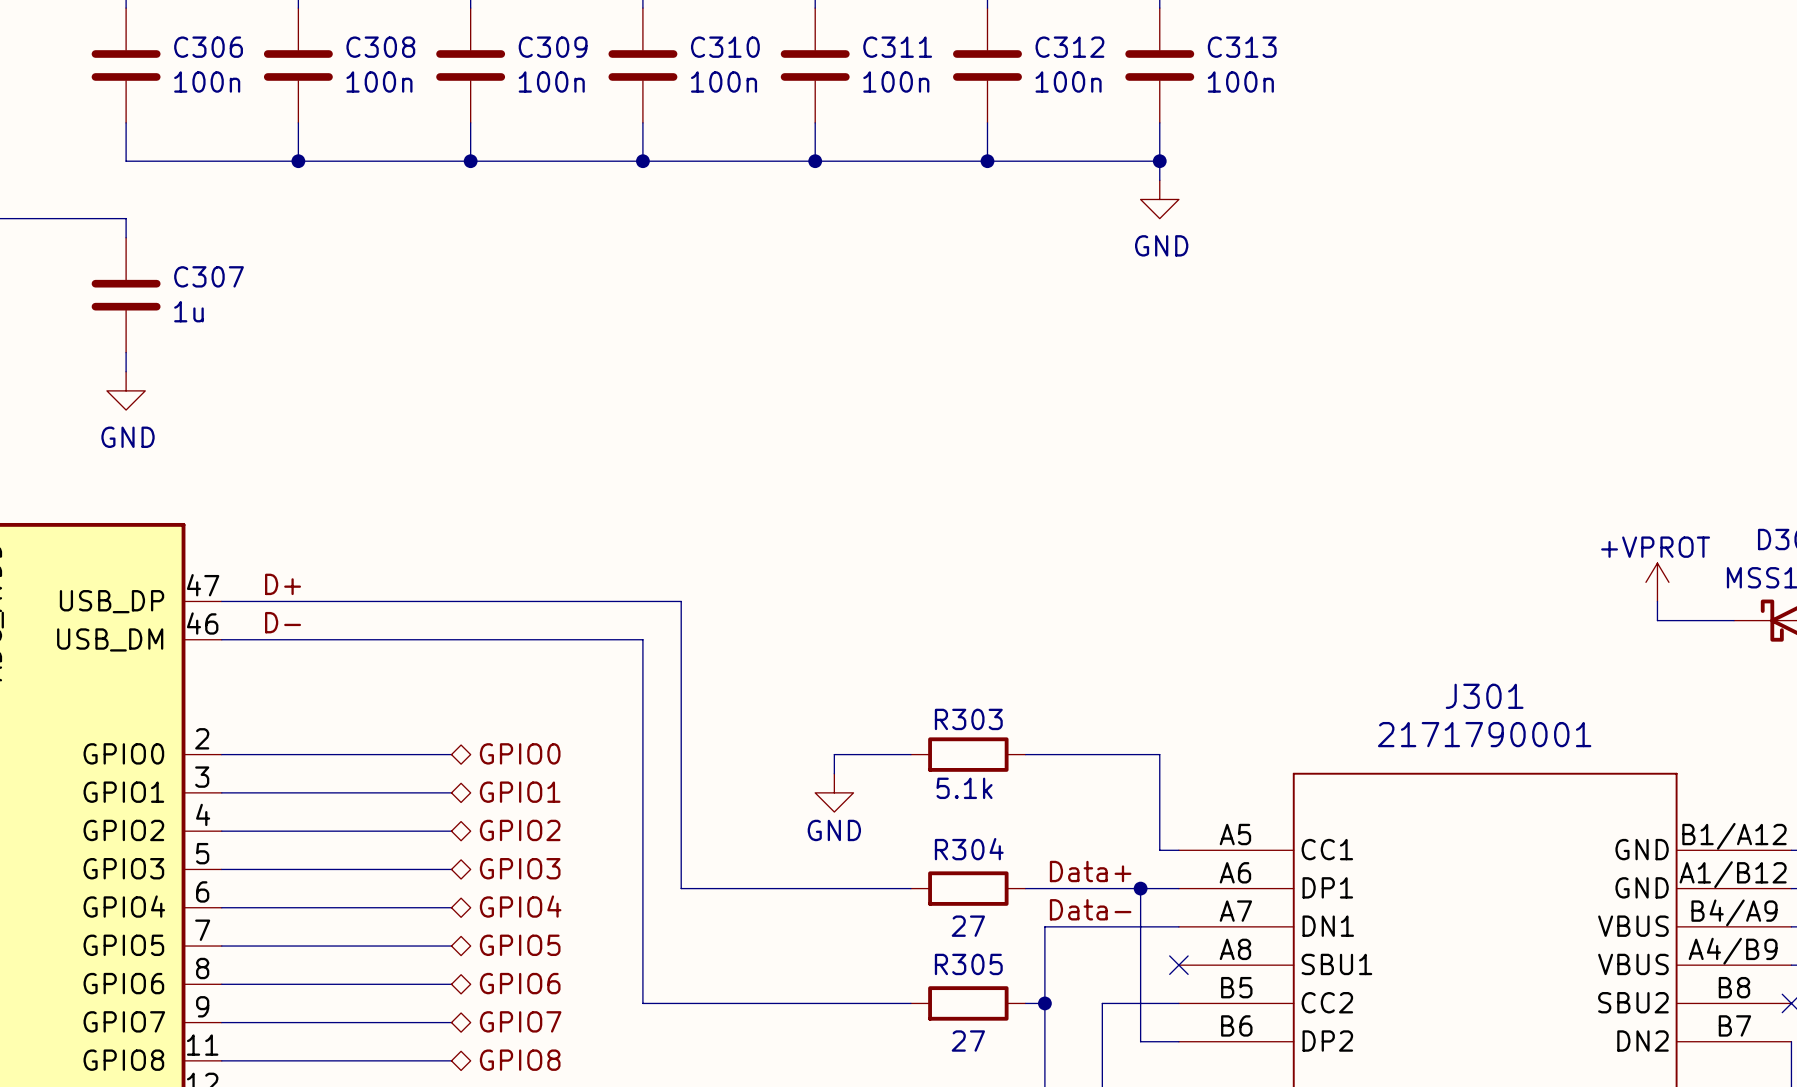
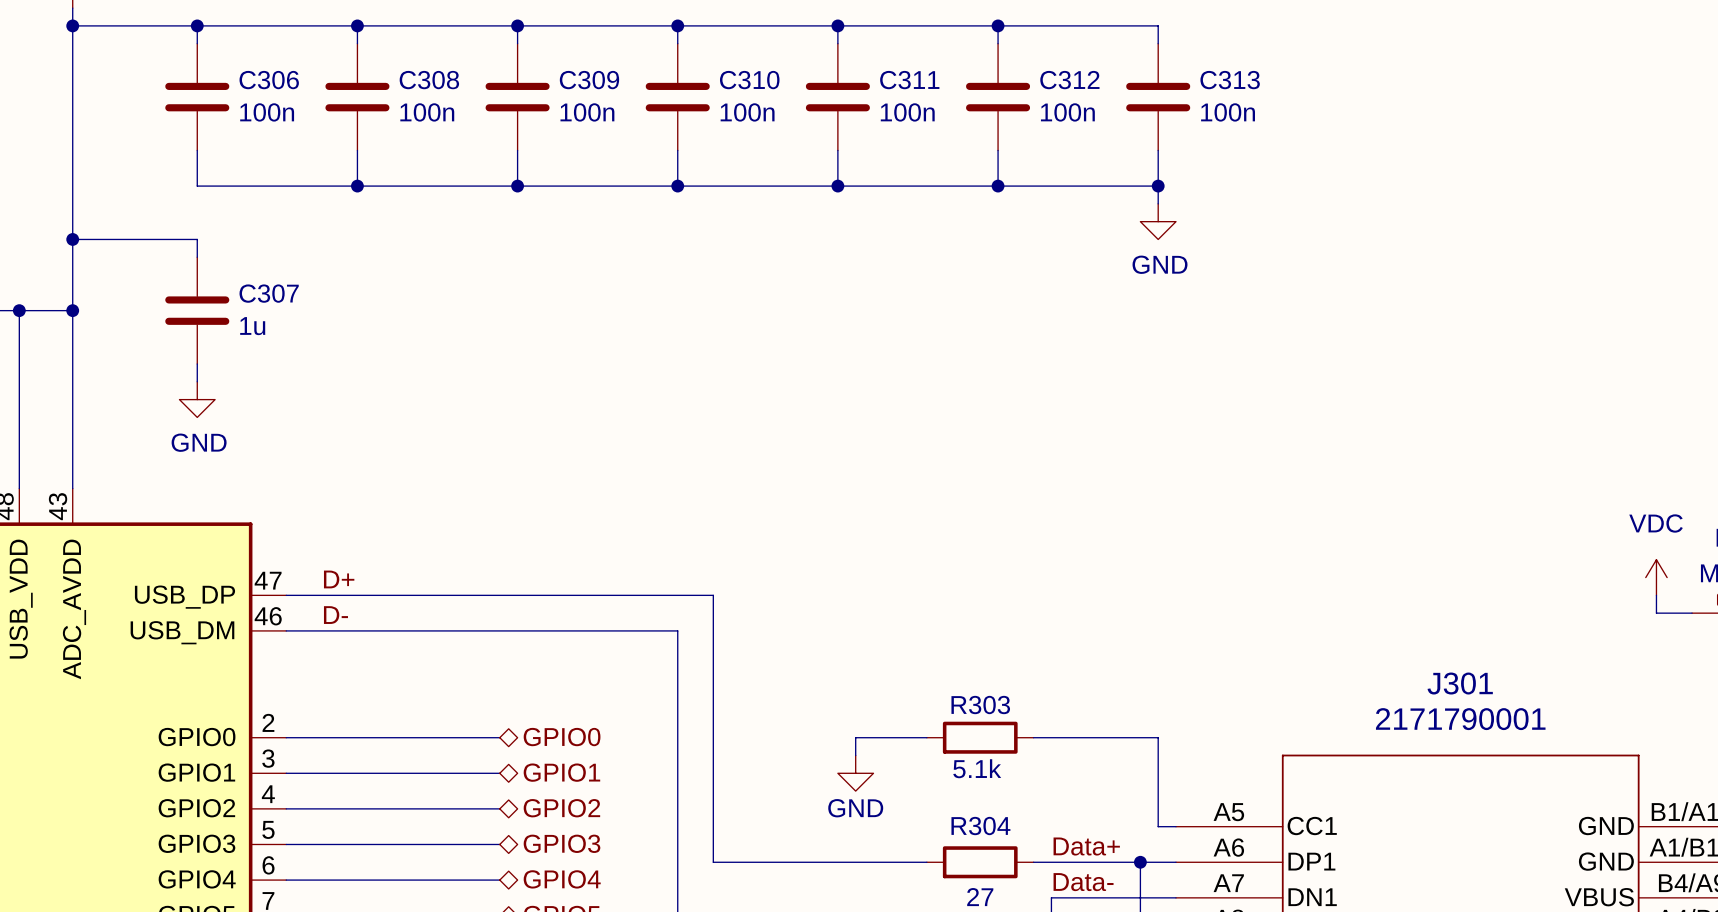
power symbol: +VPROT (1657, 582) -> none
power symbol: none -> VDC (1656, 577)
wire: (1657, 601) (1657, 620) (1695, 620) -> (1656, 595) (1656, 613)

